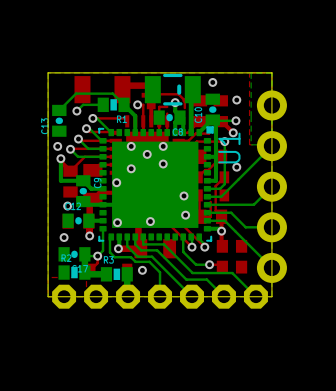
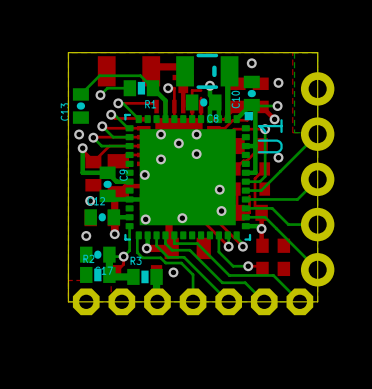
top track: (156, 94) (178, 94) (184, 100) -> none
top track: (184, 100) (184, 108) -> none

